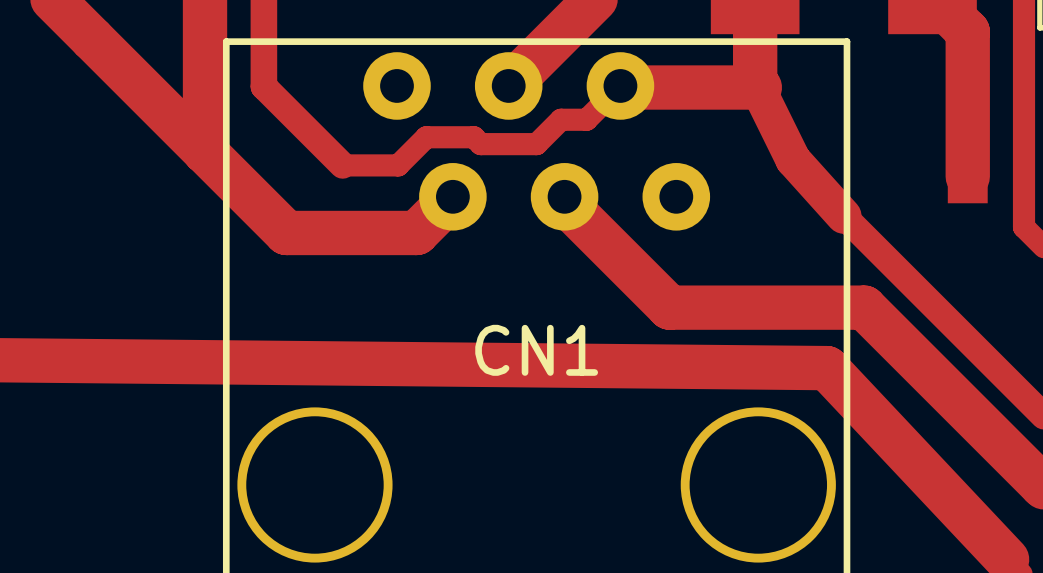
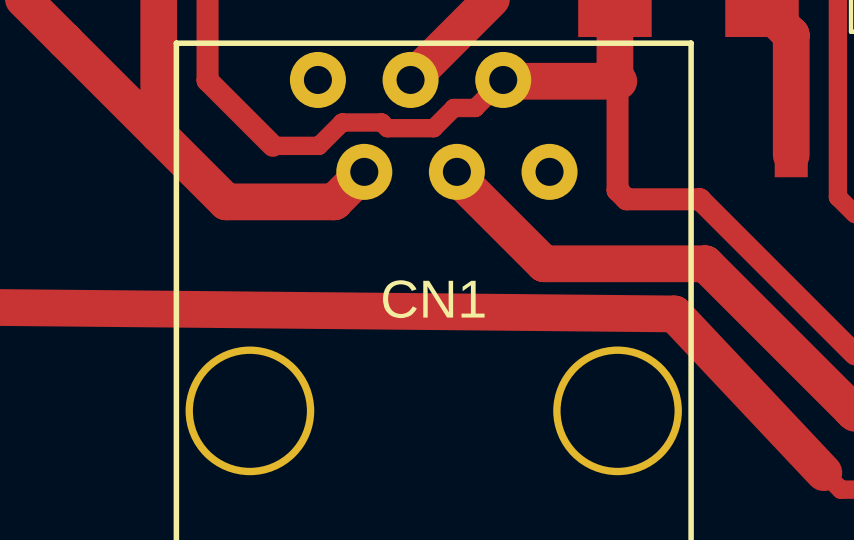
top track: (758, 89) (793, 159) (857, 229) -> (617, 82) (617, 190) (626, 199) (699, 199)

